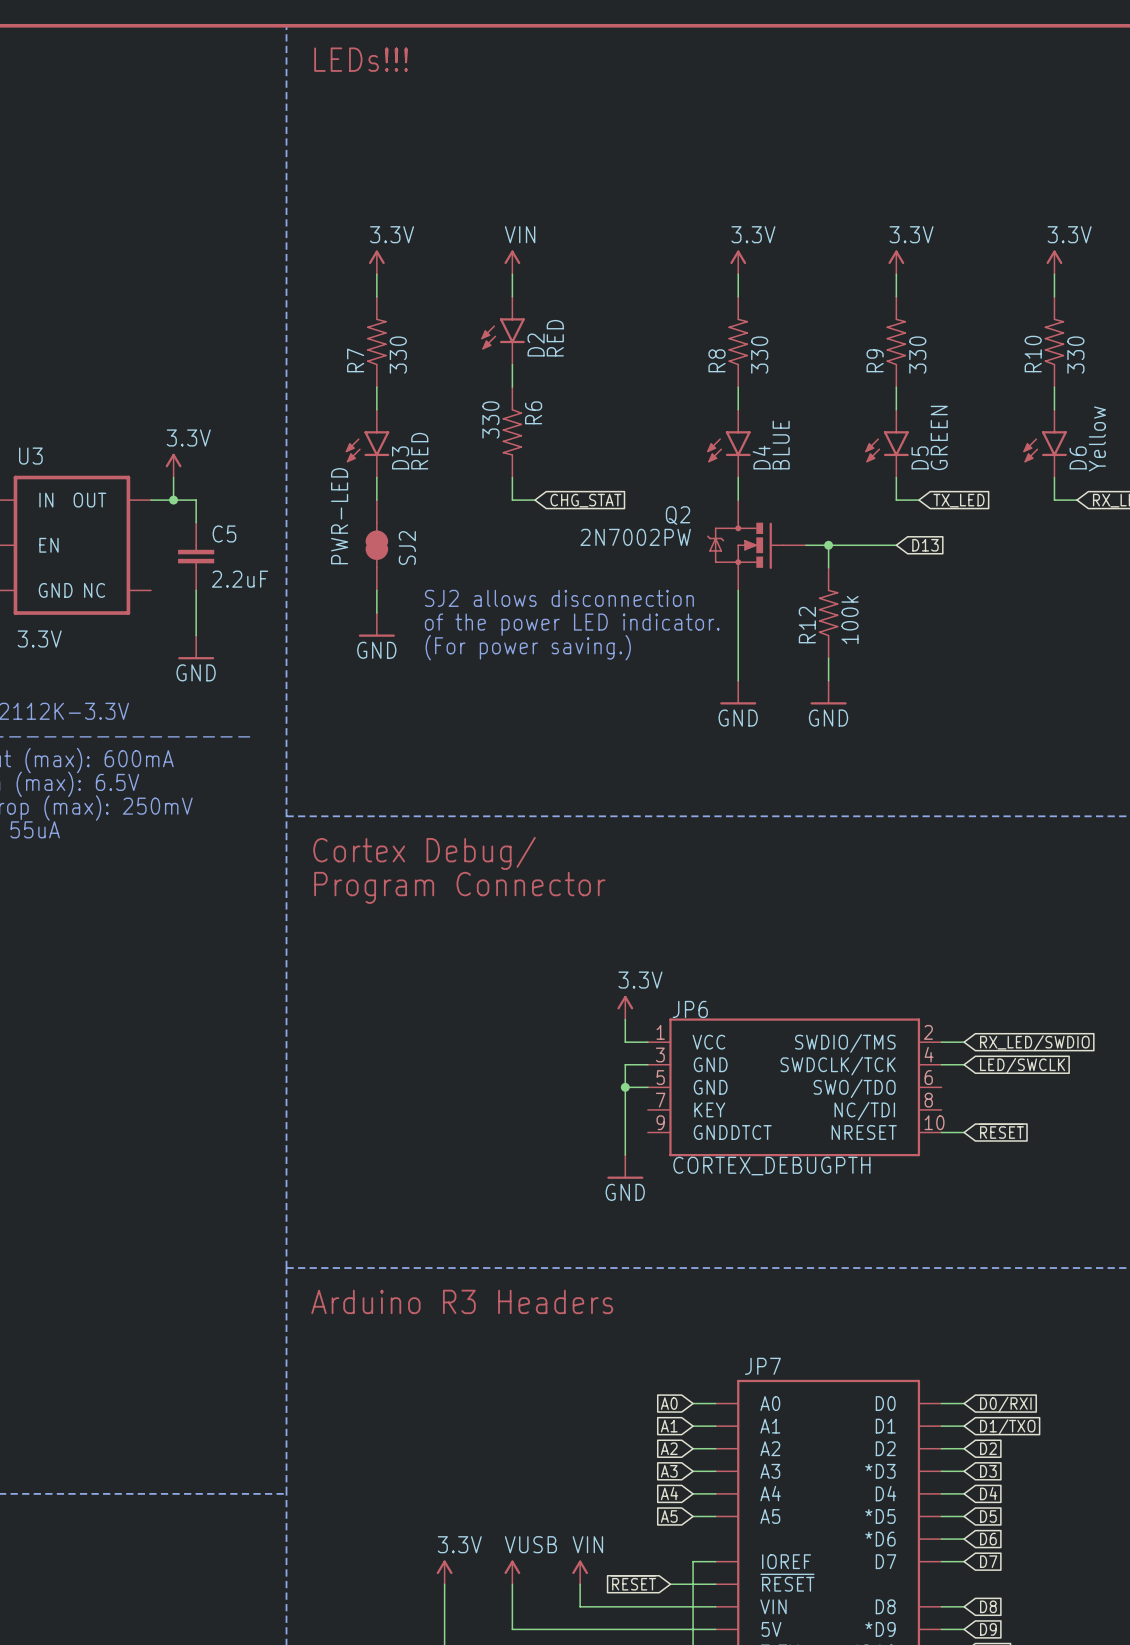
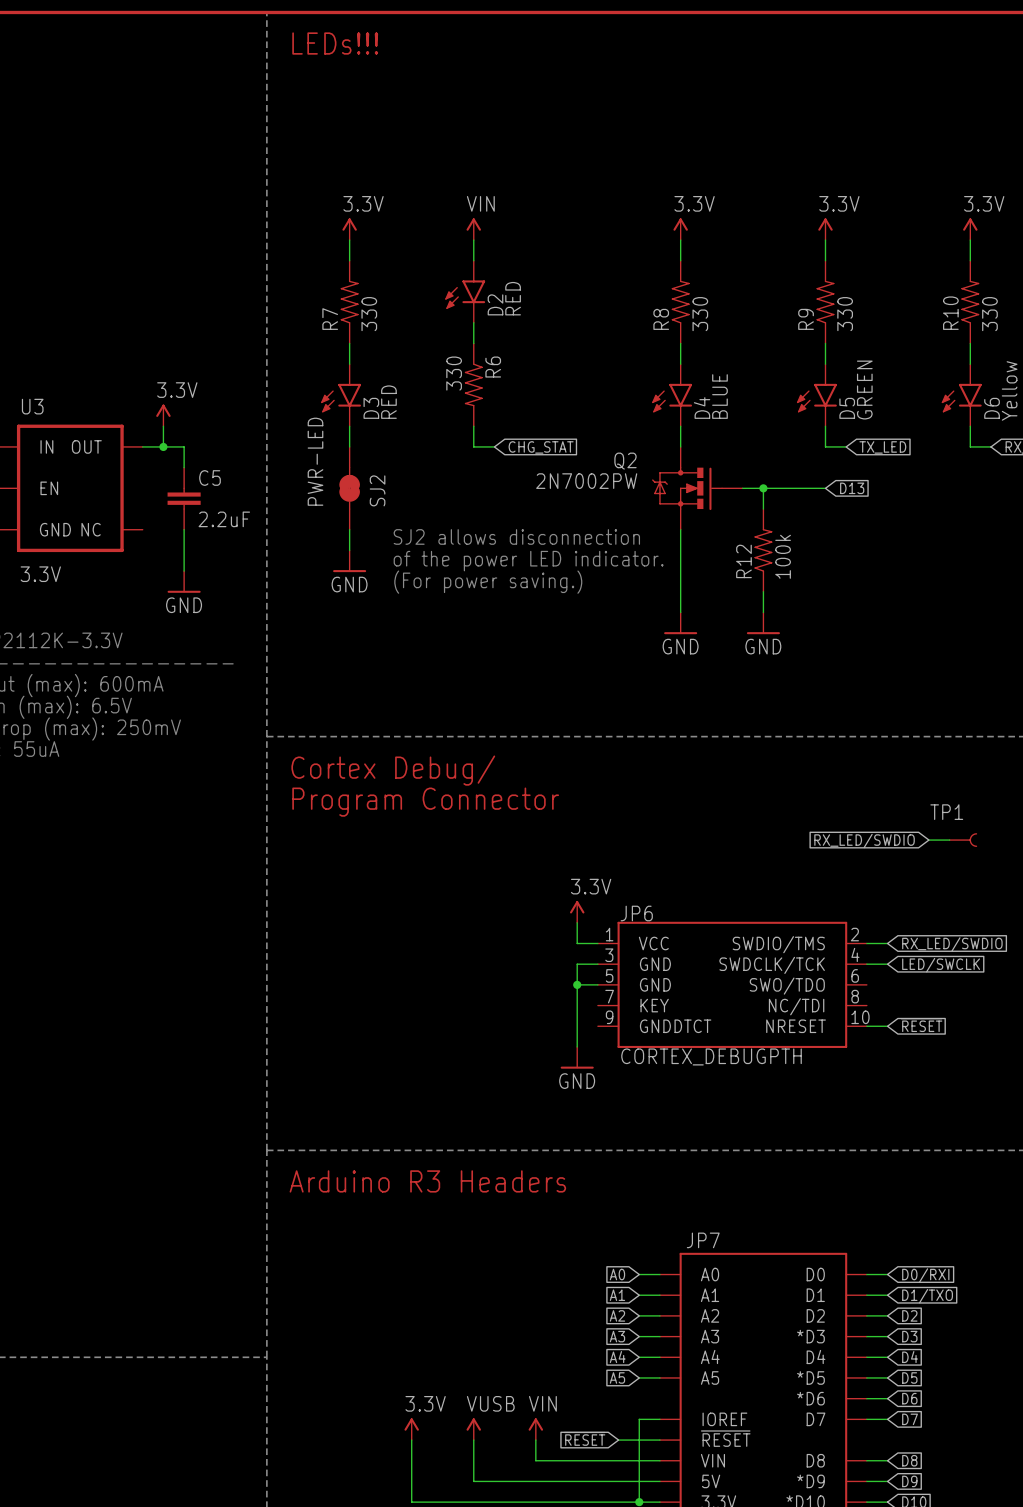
wire: none -> (928, 840) (949, 840)
TP1: none -> (963, 840)
global label: none -> RX_LED/SWDIO (864, 841)

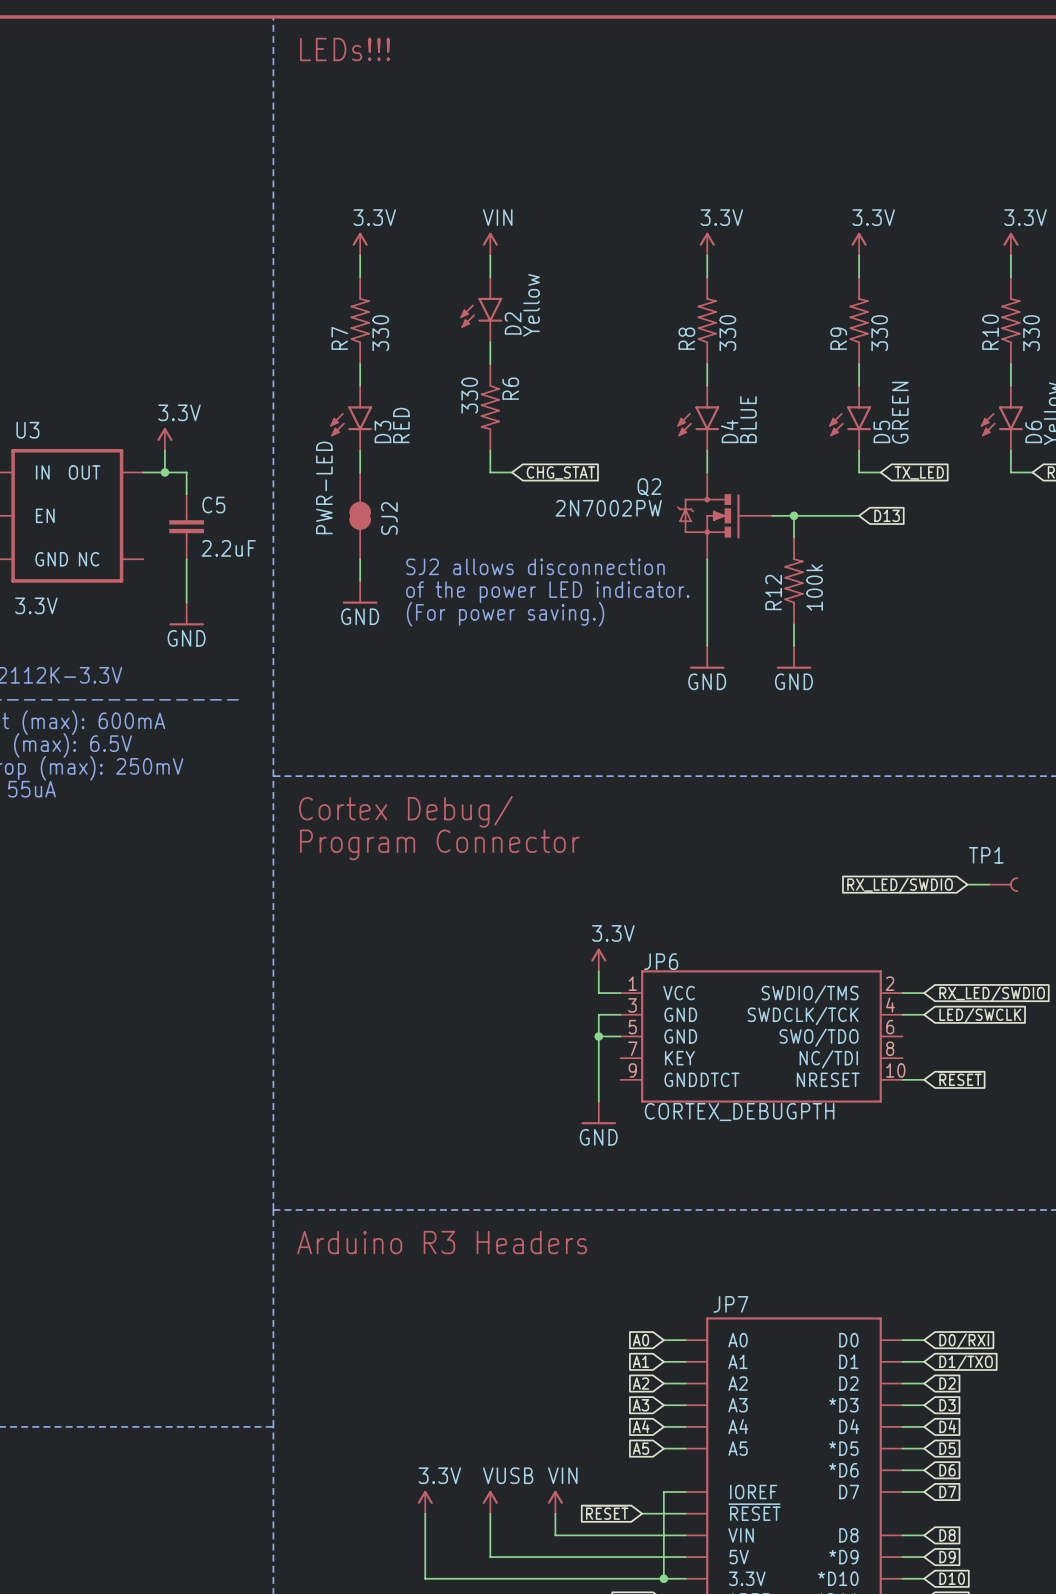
D2 value: RED (513, 298) -> Yellow (531, 305)

